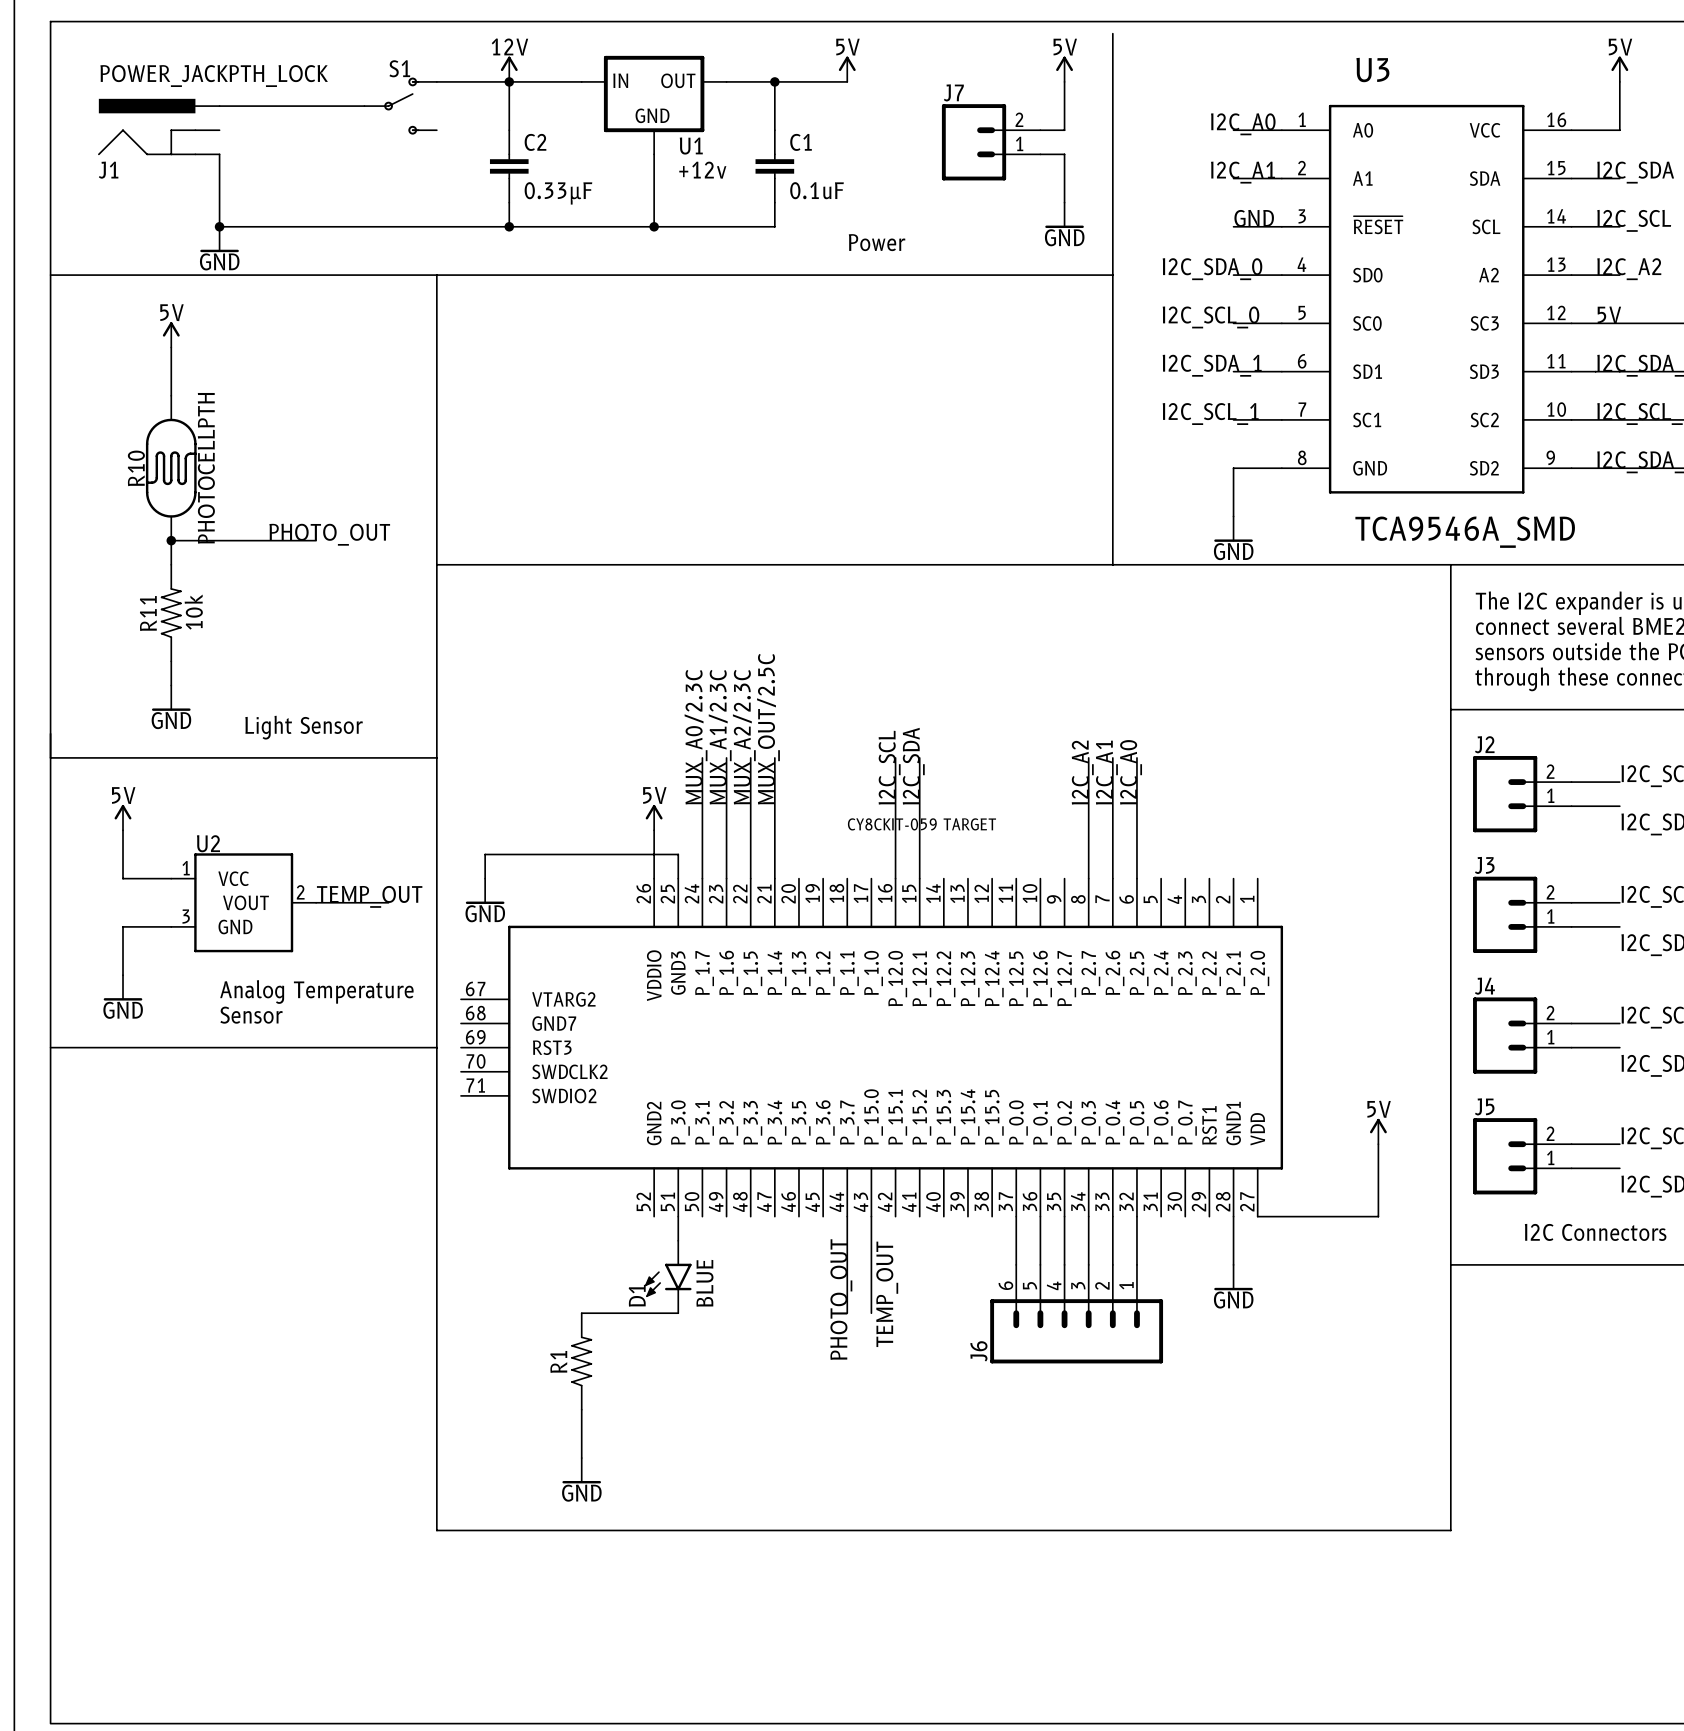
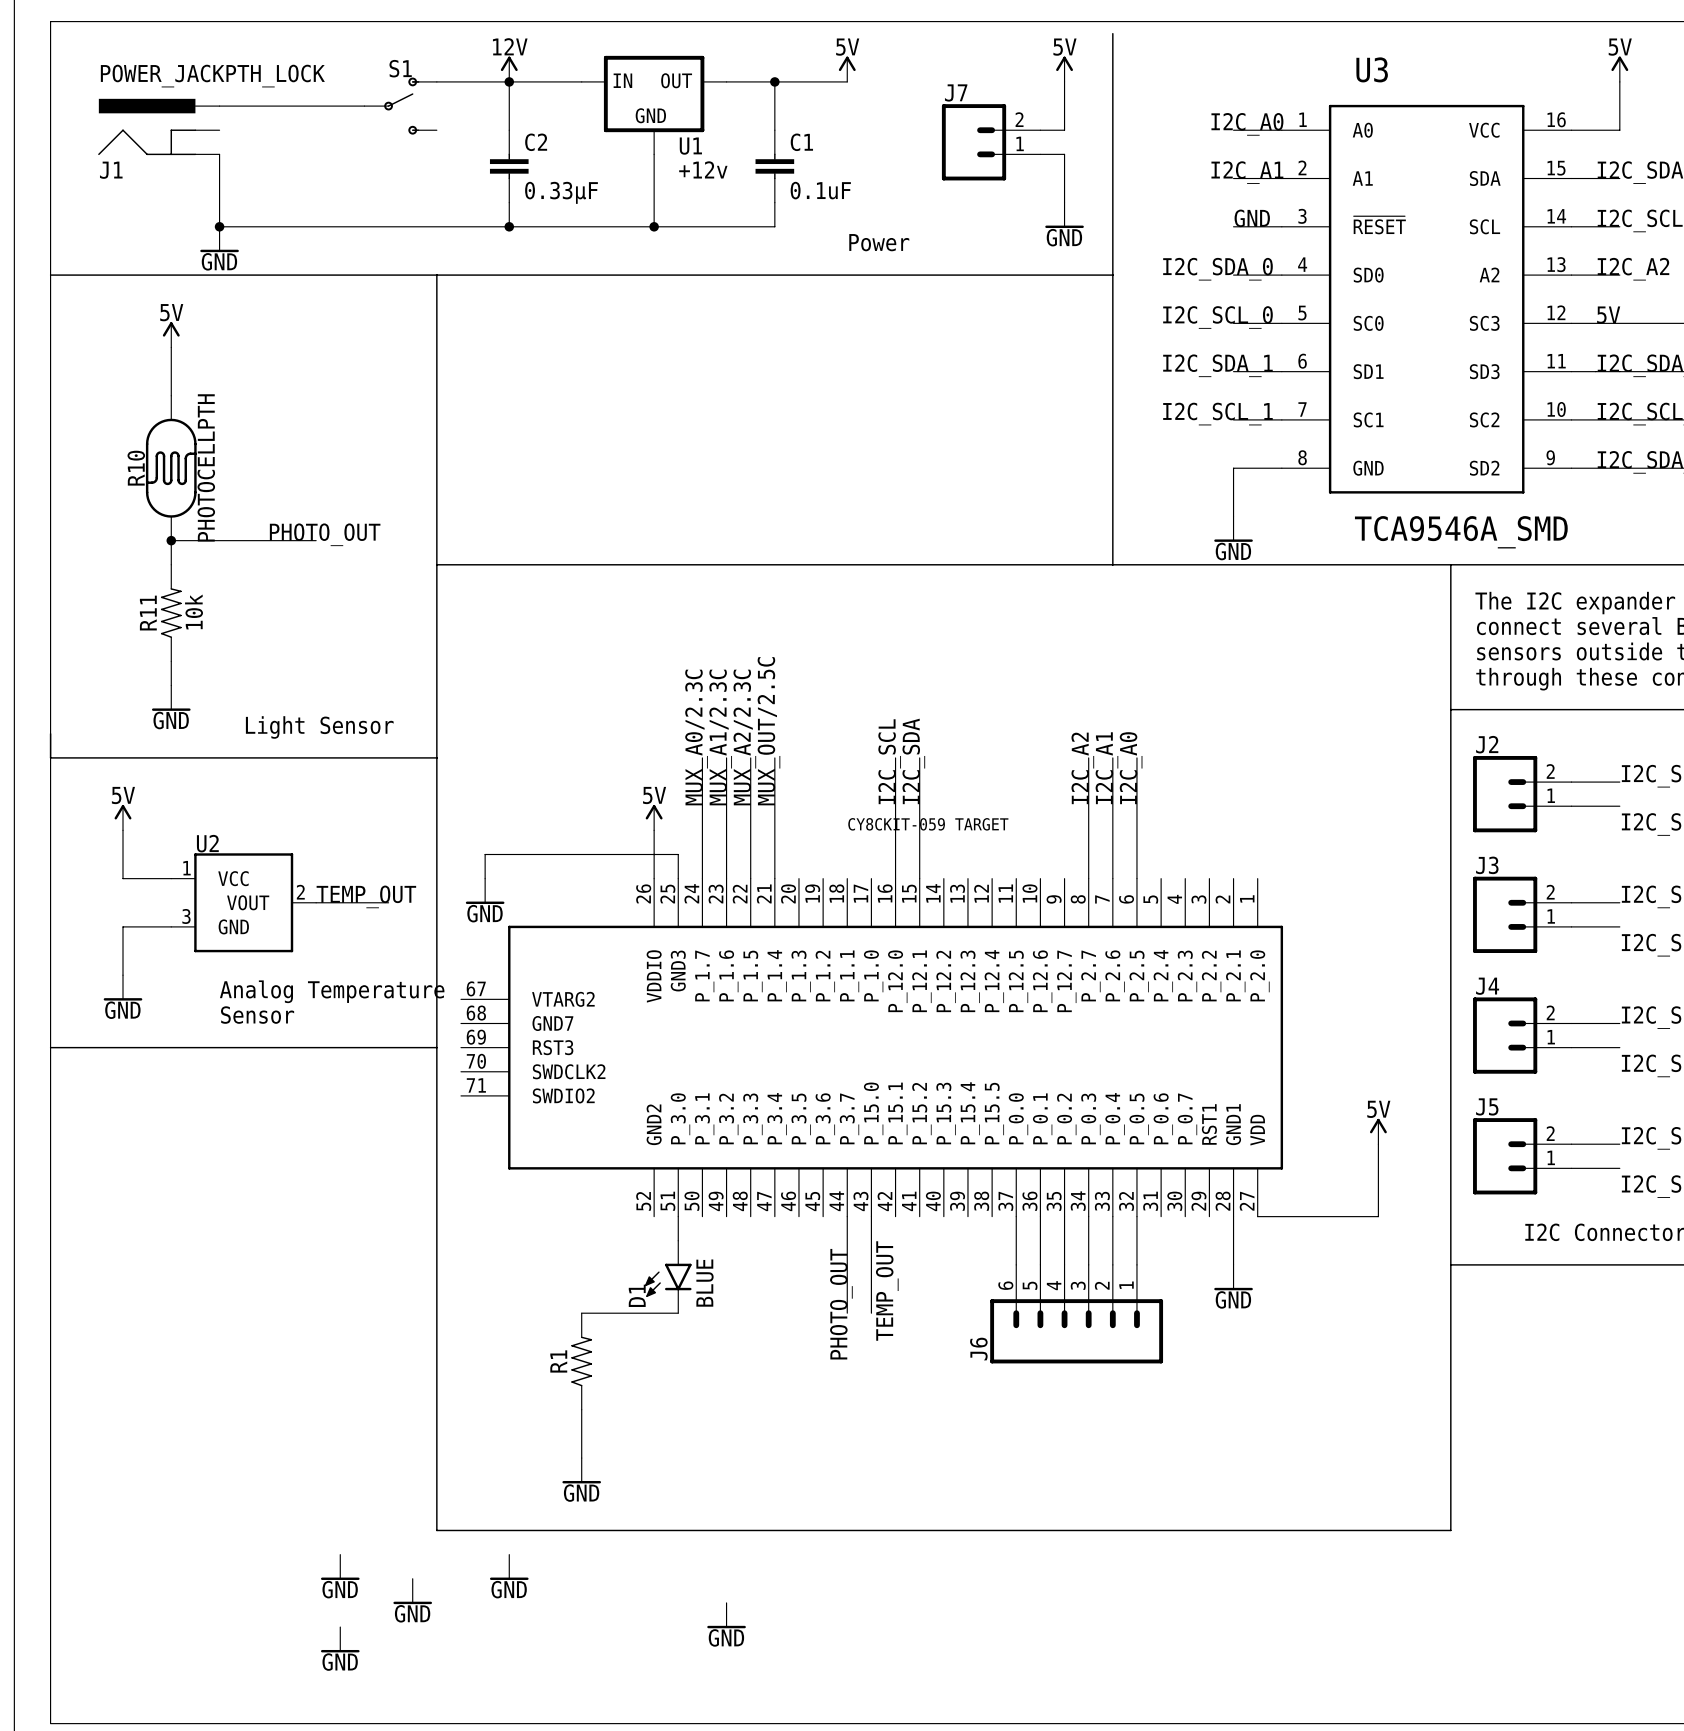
power symbol: none -> GND (340, 1567)
power symbol: none -> GND (509, 1567)
power symbol: none -> GND (412, 1591)
power symbol: none -> GND (726, 1615)
power symbol: none -> GND (340, 1639)

